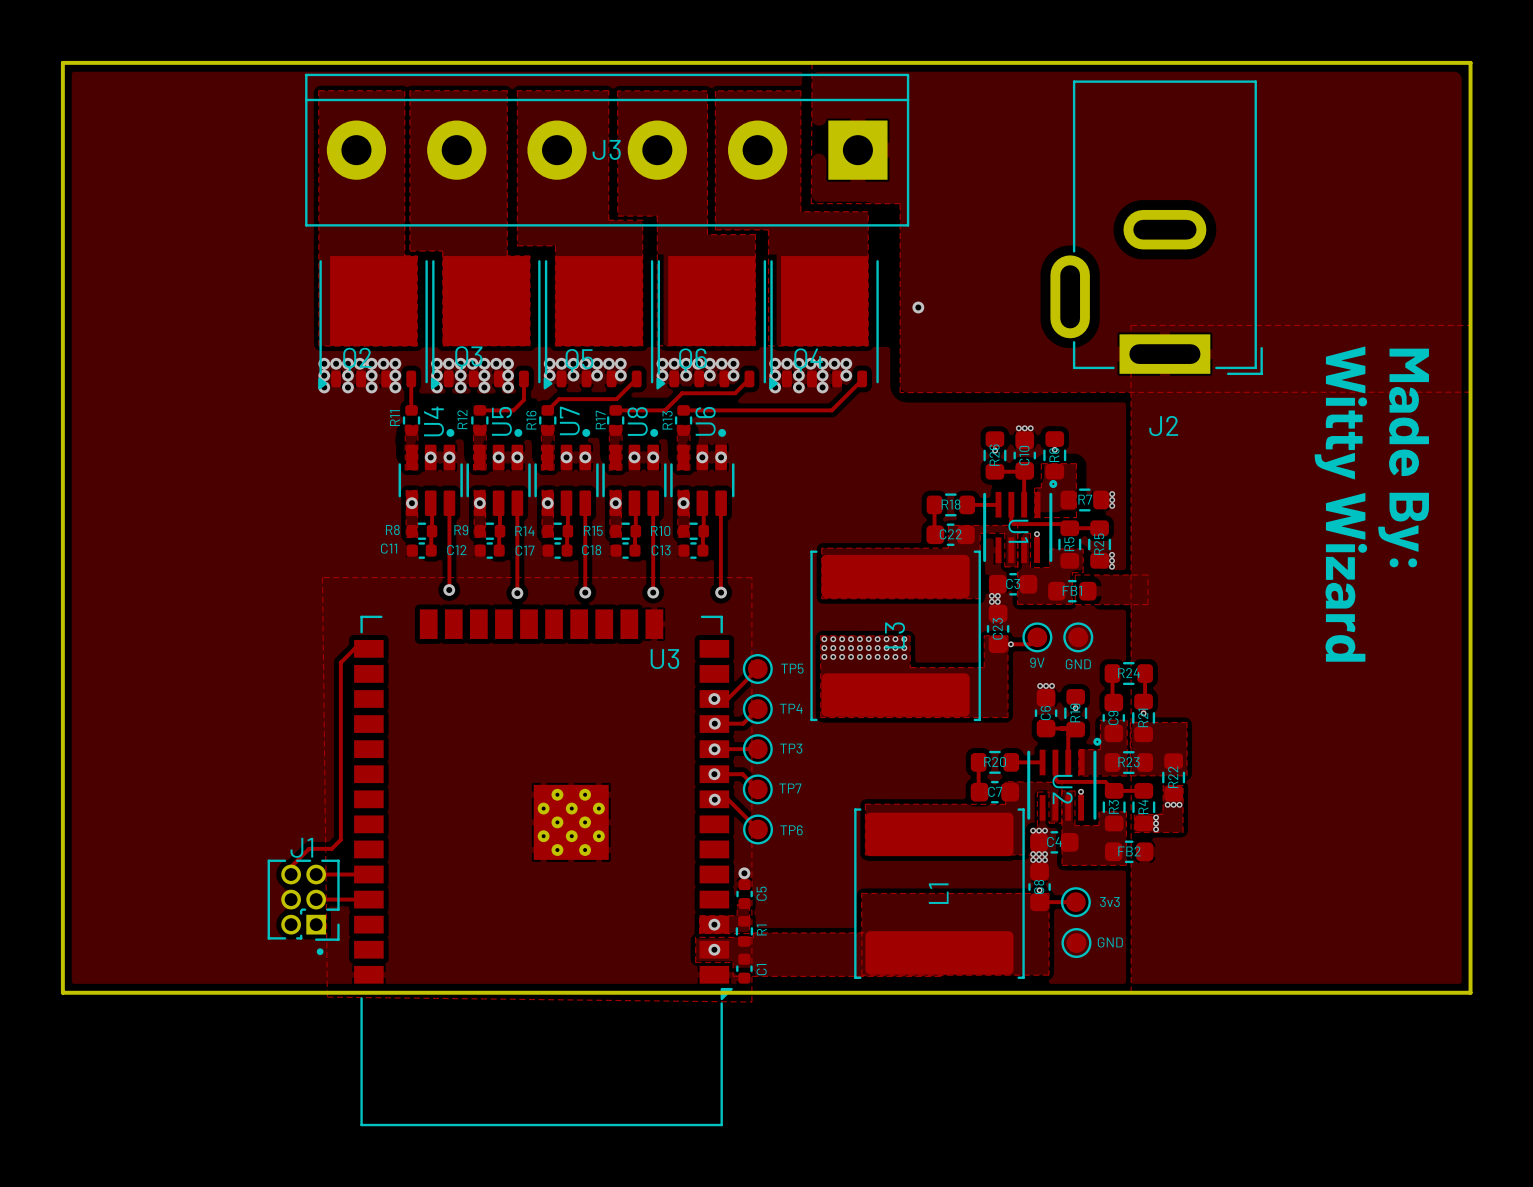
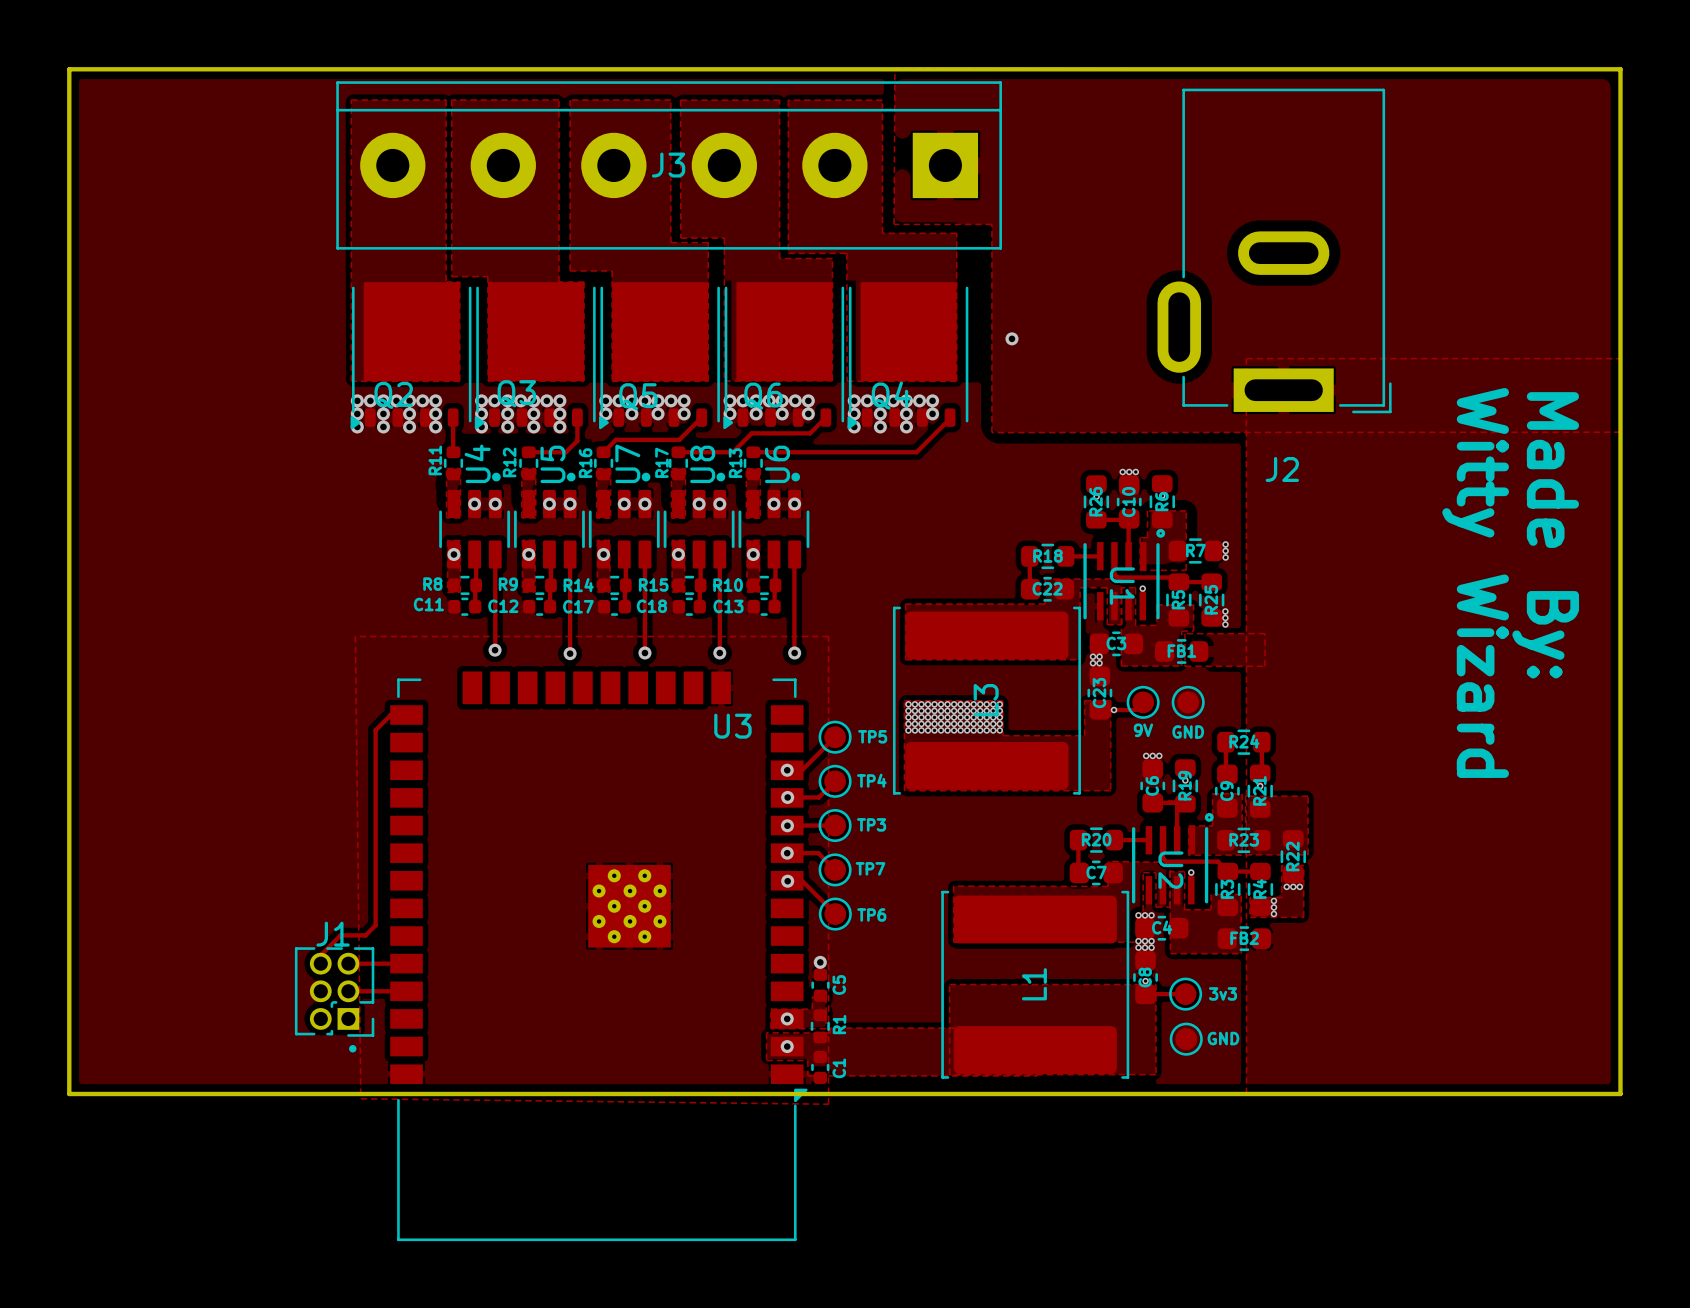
via: none -> (914, 704)
via: (833, 639) -> none
via: none -> (921, 704)
via: none -> (934, 704)
via: (851, 639) -> none
via: none -> (941, 704)
via: none -> (954, 704)
via: (868, 639) -> none
via: none -> (960, 704)
via: none -> (973, 704)
via: (886, 639) -> none
via: none -> (980, 704)
via: none -> (993, 704)
via: (904, 639) -> none
via: none -> (999, 704)
via: none -> (908, 710)
via: none -> (914, 710)
via: none -> (921, 710)
via: none -> (928, 710)
via: none -> (934, 710)
via: none -> (941, 710)
via: none -> (947, 710)
via: none -> (954, 710)
via: none -> (960, 710)
via: none -> (967, 710)
via: none -> (973, 710)
via: none -> (980, 710)
via: none -> (986, 710)
via: none -> (993, 710)
via: none -> (999, 710)
via: (824, 648) -> none
via: (833, 648) -> none
via: (842, 648) -> none
via: (851, 648) -> none
via: (859, 648) -> none
via: (868, 648) -> none
via: (877, 648) -> none
via: (886, 648) -> none
via: (895, 648) -> none
via: (904, 648) -> none
via: none -> (908, 717)
via: none -> (914, 717)
via: none -> (921, 717)
via: none -> (928, 717)
via: none -> (934, 717)
via: none -> (941, 717)
via: none -> (947, 717)
via: none -> (954, 717)
via: none -> (960, 717)
via: none -> (967, 717)
via: none -> (973, 717)
via: none -> (980, 717)
via: none -> (986, 717)
via: none -> (993, 717)
via: none -> (999, 717)
via: none -> (914, 723)
via: (833, 656) -> none
via: none -> (921, 723)
via: none -> (934, 723)
via: (851, 656) -> none
via: none -> (941, 723)
via: none -> (954, 723)
via: (868, 656) -> none
via: none -> (960, 723)
via: none -> (973, 723)
via: (886, 656) -> none
via: none -> (980, 723)
via: none -> (993, 723)
via: (904, 656) -> none
via: none -> (999, 723)
via: none -> (908, 730)
via: none -> (914, 730)
via: none -> (921, 730)
via: none -> (928, 730)
via: none -> (934, 730)
via: none -> (941, 730)
via: none -> (947, 730)
via: none -> (954, 730)
via: none -> (960, 730)
via: none -> (967, 730)
via: none -> (973, 730)
via: none -> (980, 730)
via: none -> (986, 730)
via: none -> (993, 730)
via: none -> (999, 730)

